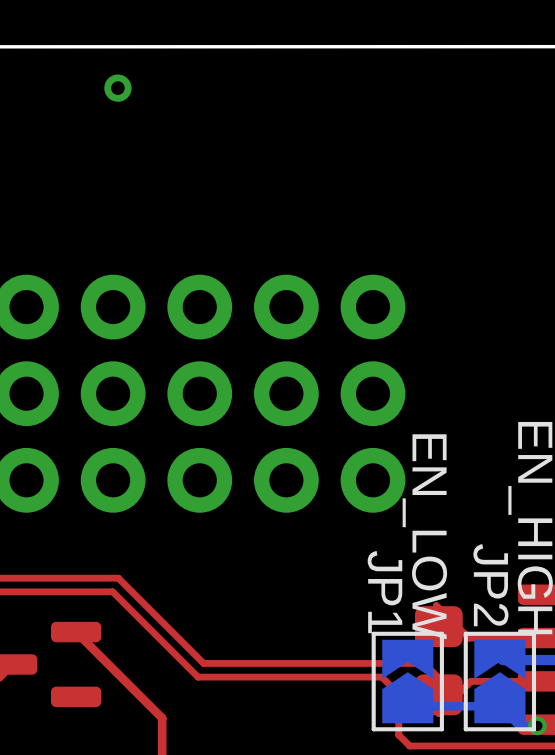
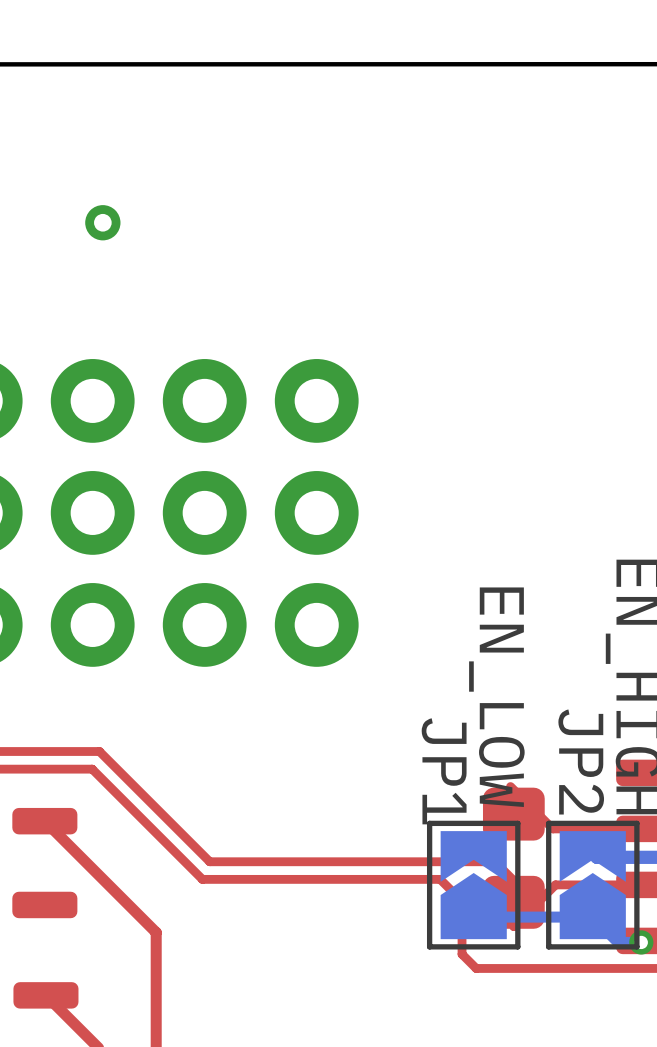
via position: (117, 88) -> (102, 222)
part: (373, 307) -> none
part: (373, 393) -> none
part: (373, 480) -> none

